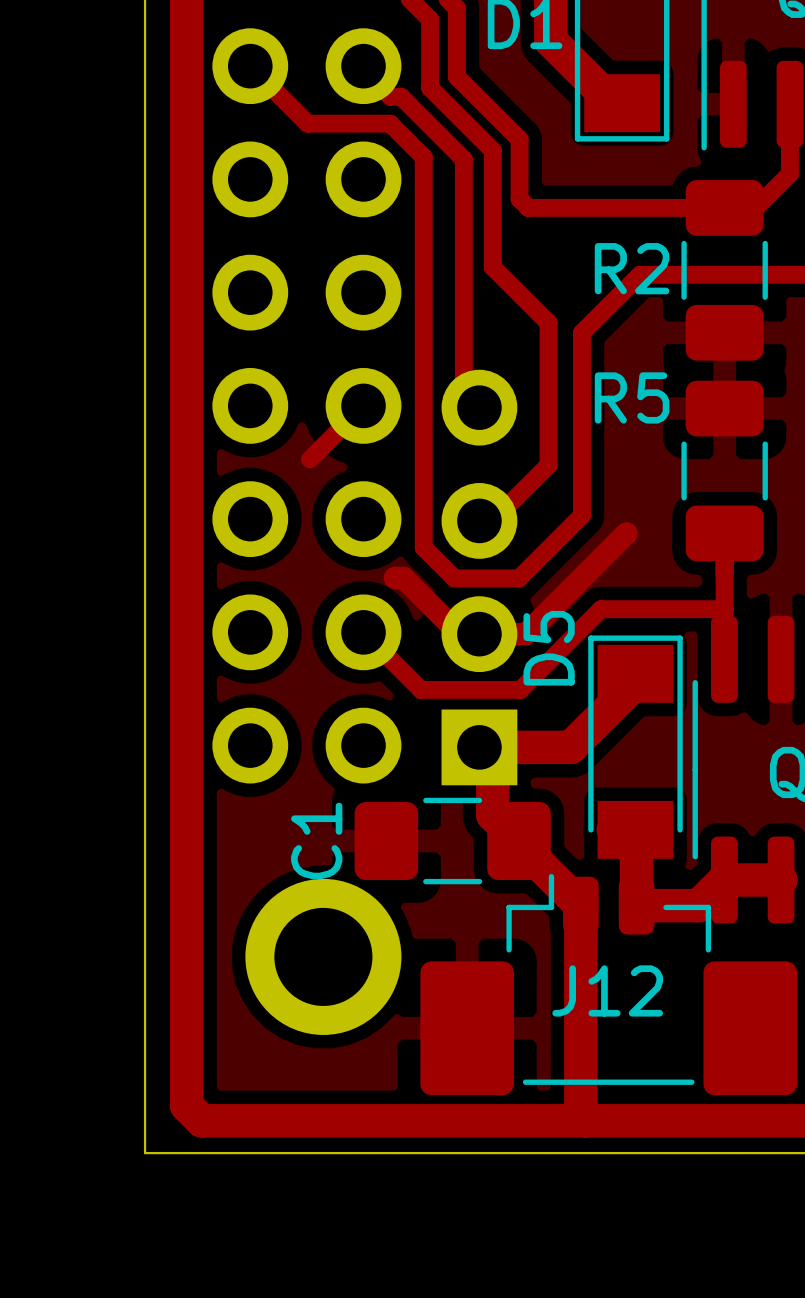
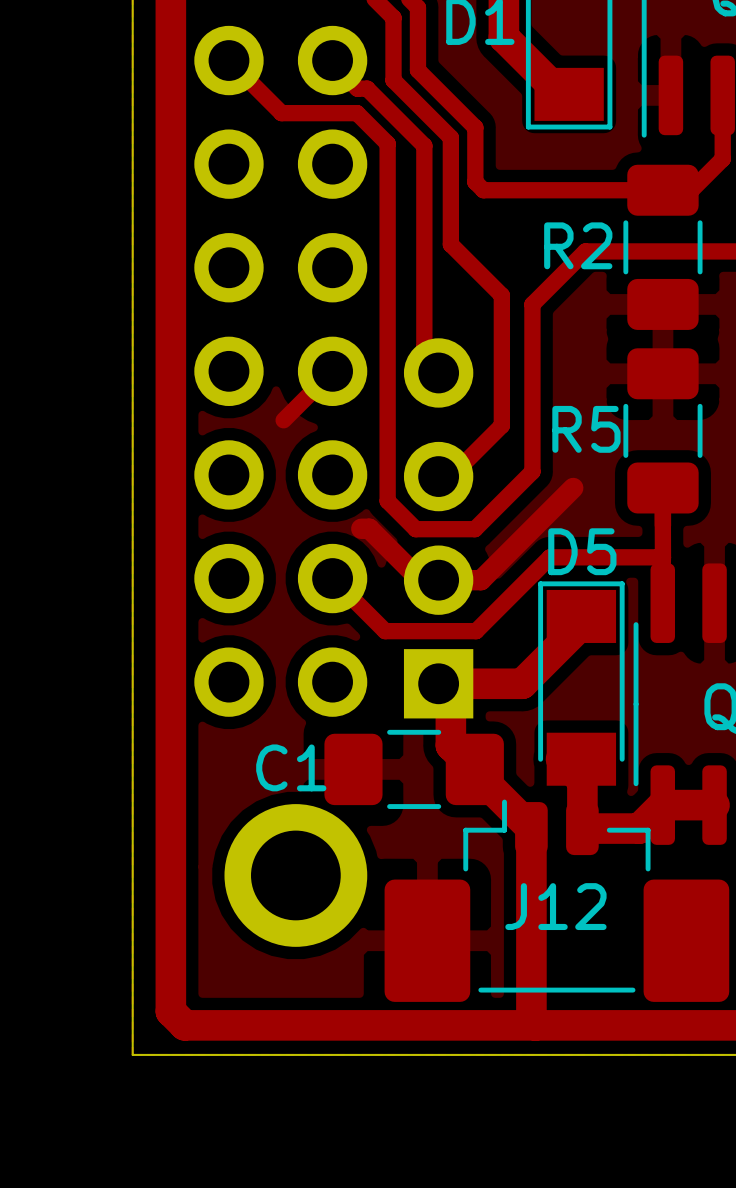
R5 name position: R5 (632, 397) -> R5 (586, 429)
D5 name rotation: 0° (549, 648) -> 90° clockwise (582, 551)
C1 name rotation: 0° (316, 841) -> 90° clockwise (291, 767)

